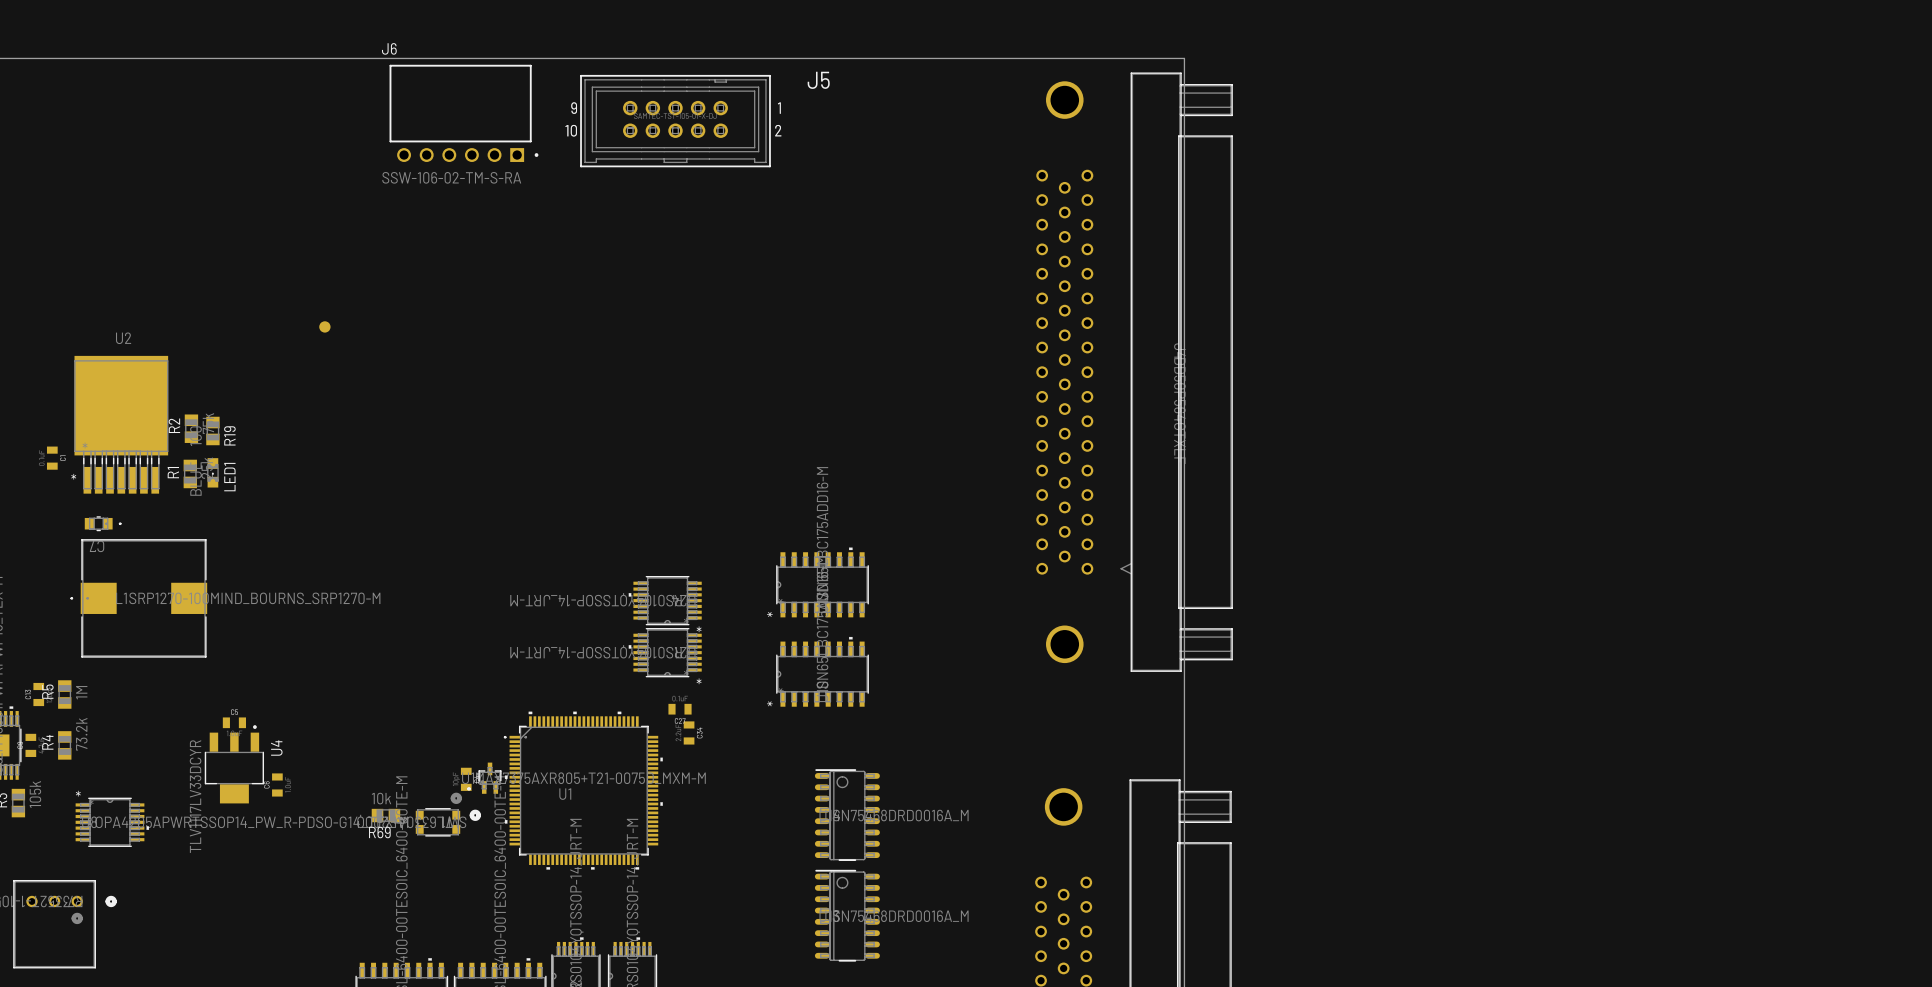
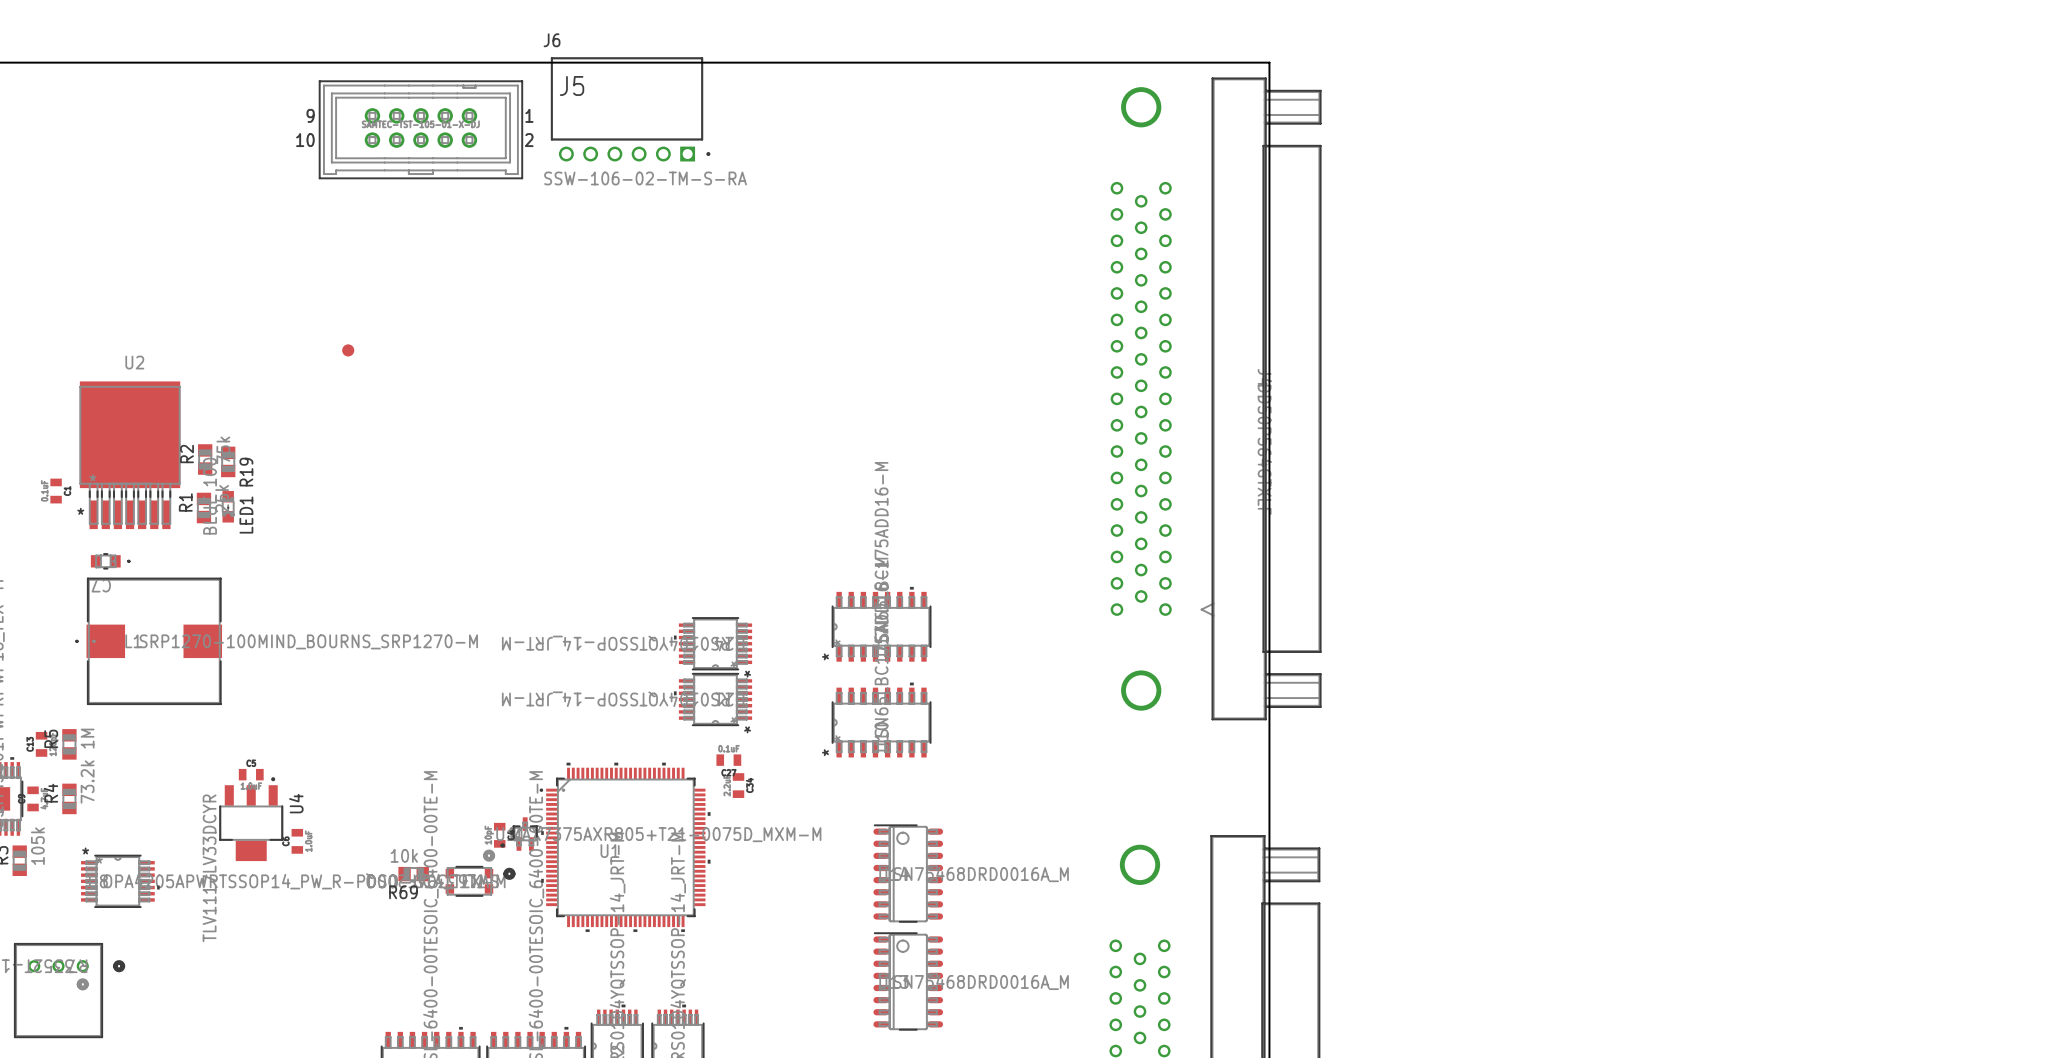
J6 position: (463, 113) -> (630, 109)
J5 position: (675, 121) -> (420, 129)

